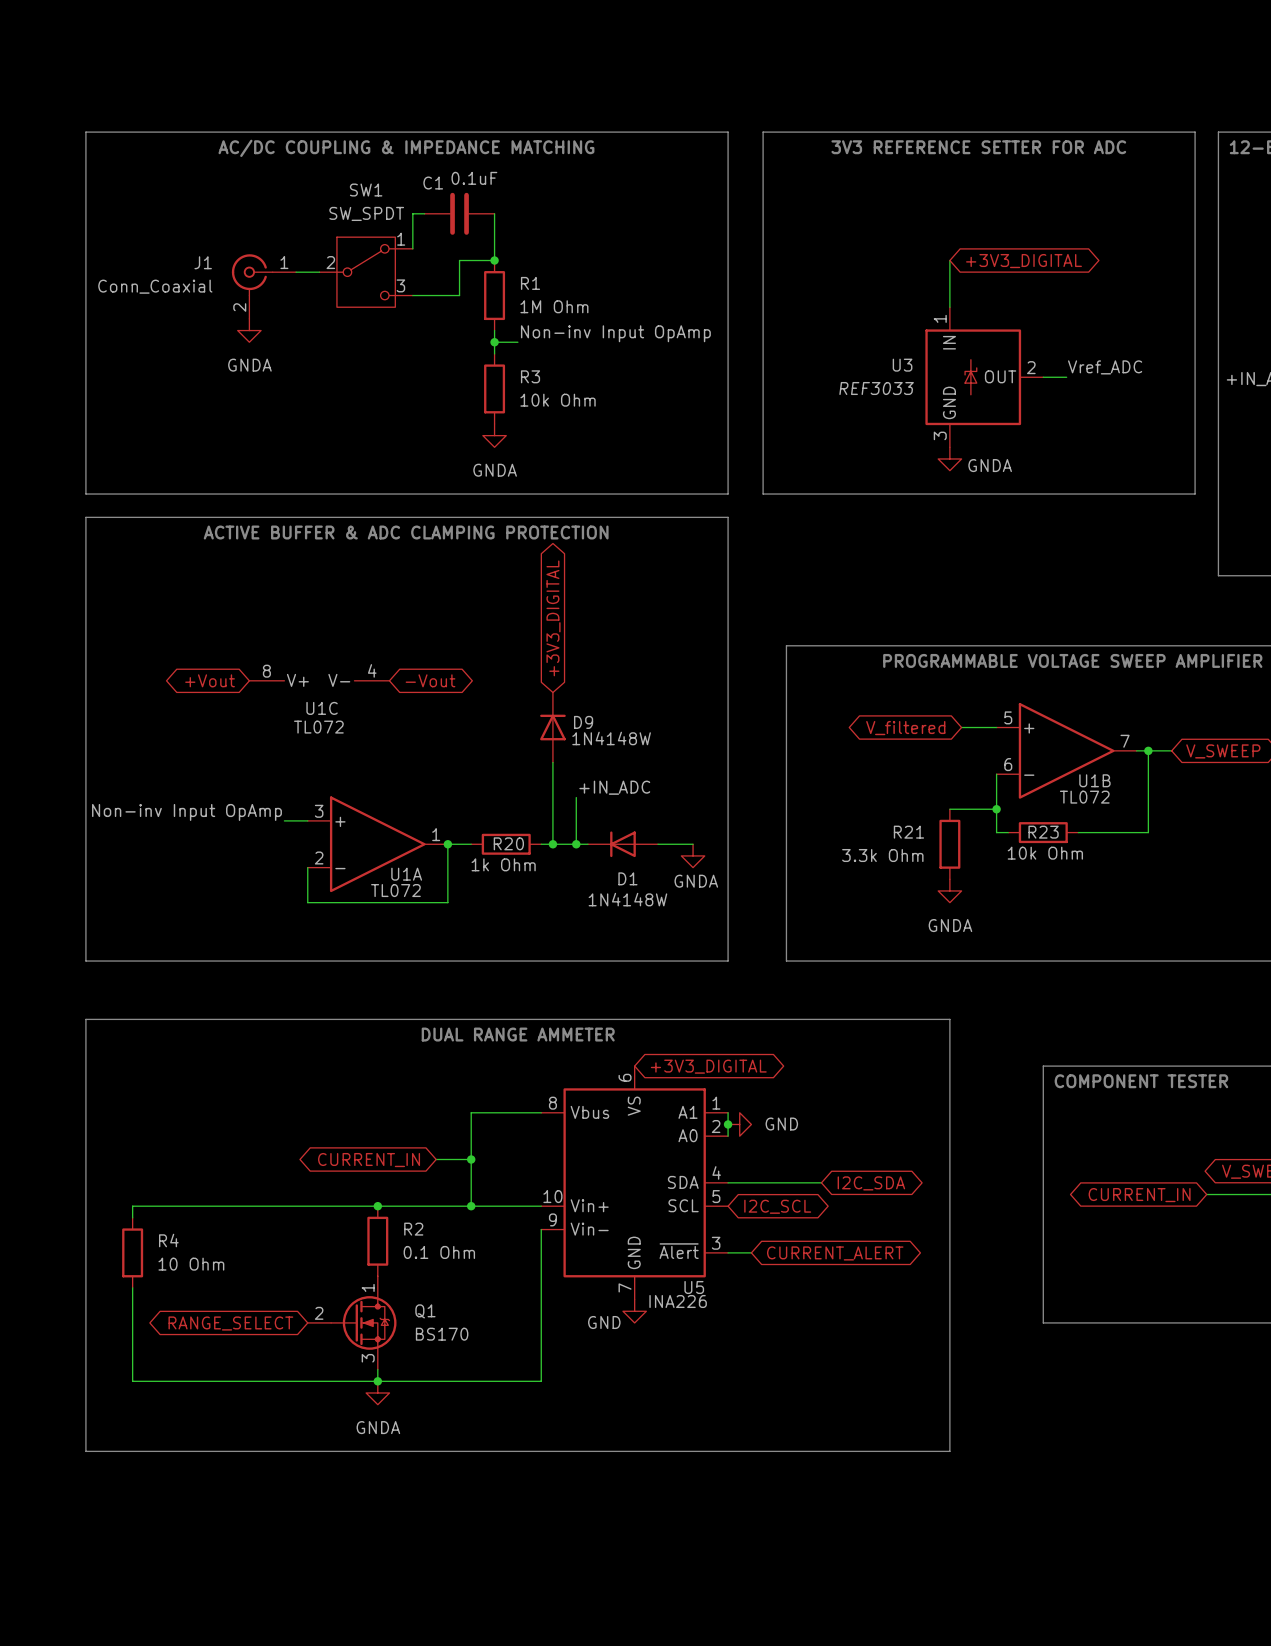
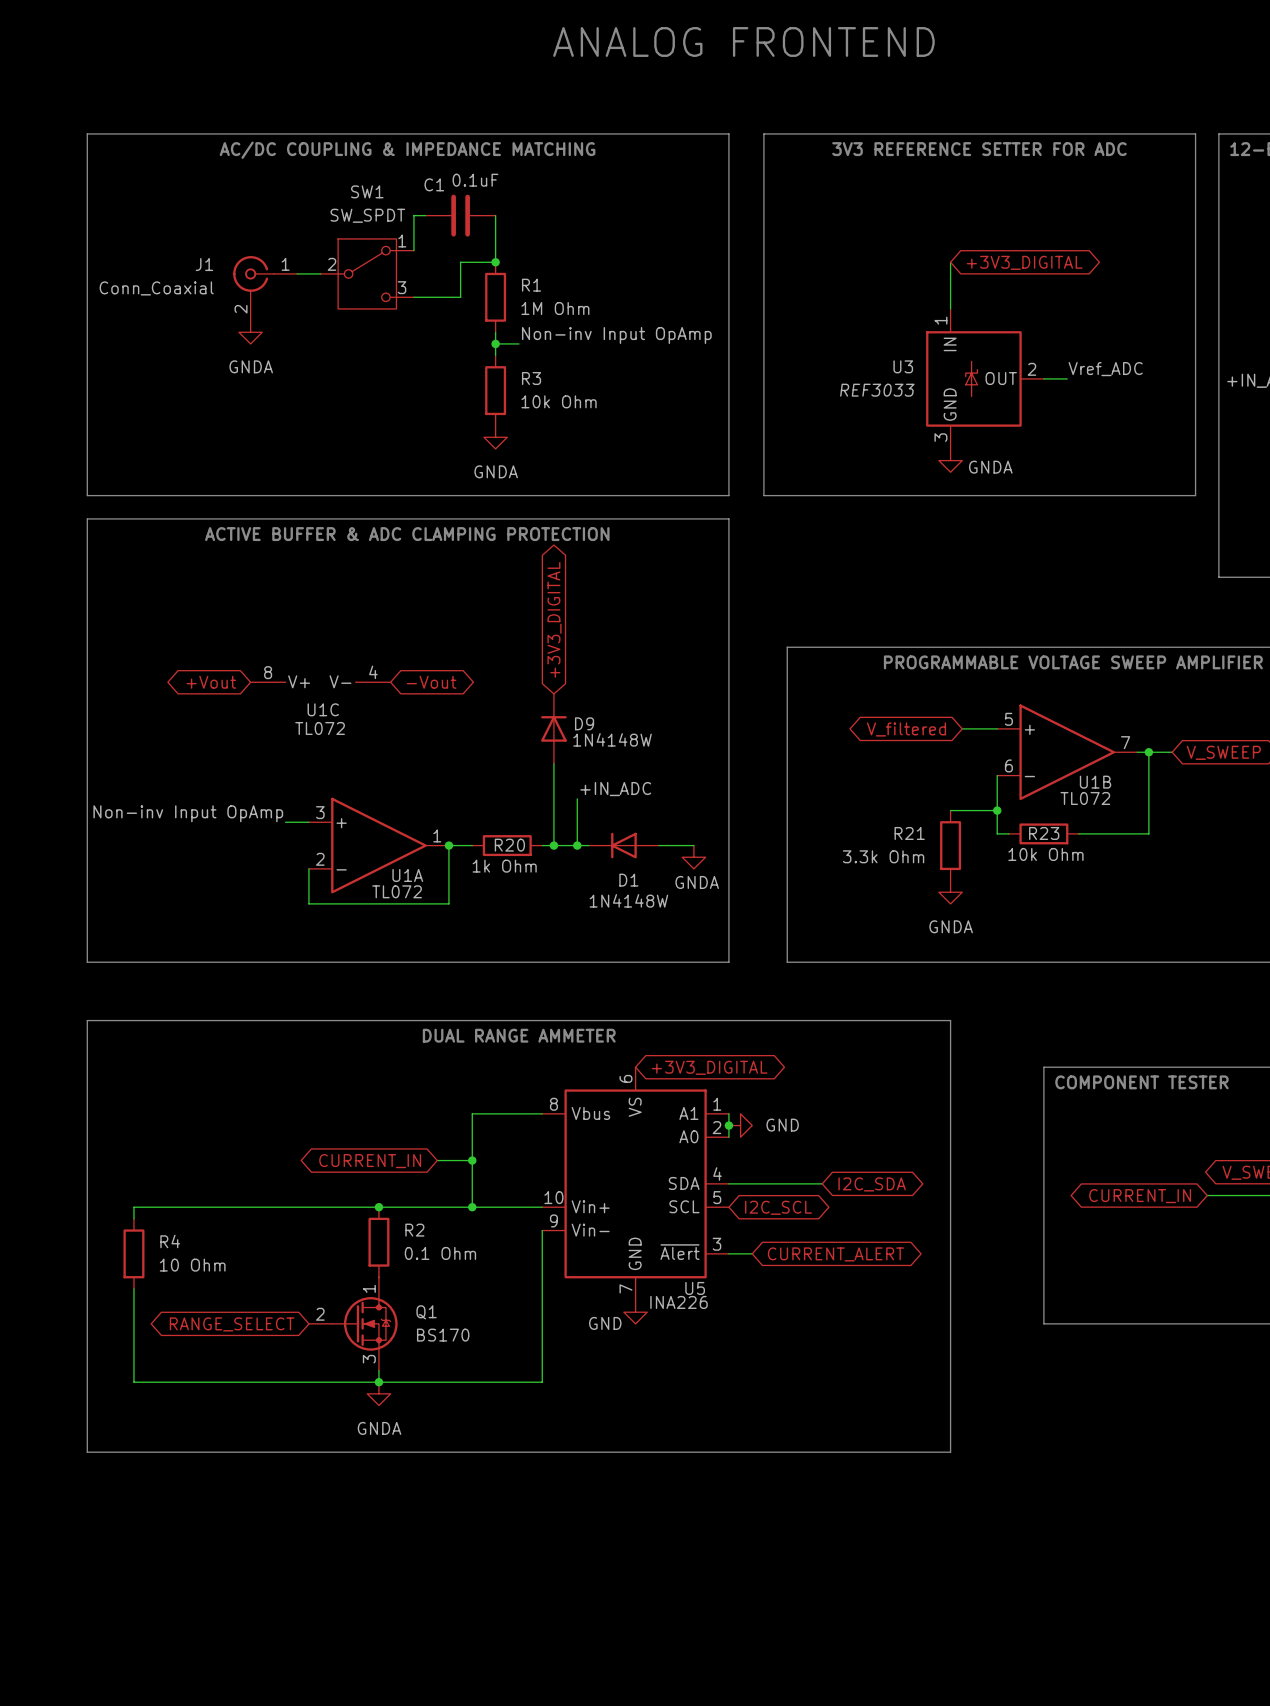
text: none -> ANALOG FRONTEND (743, 41)

